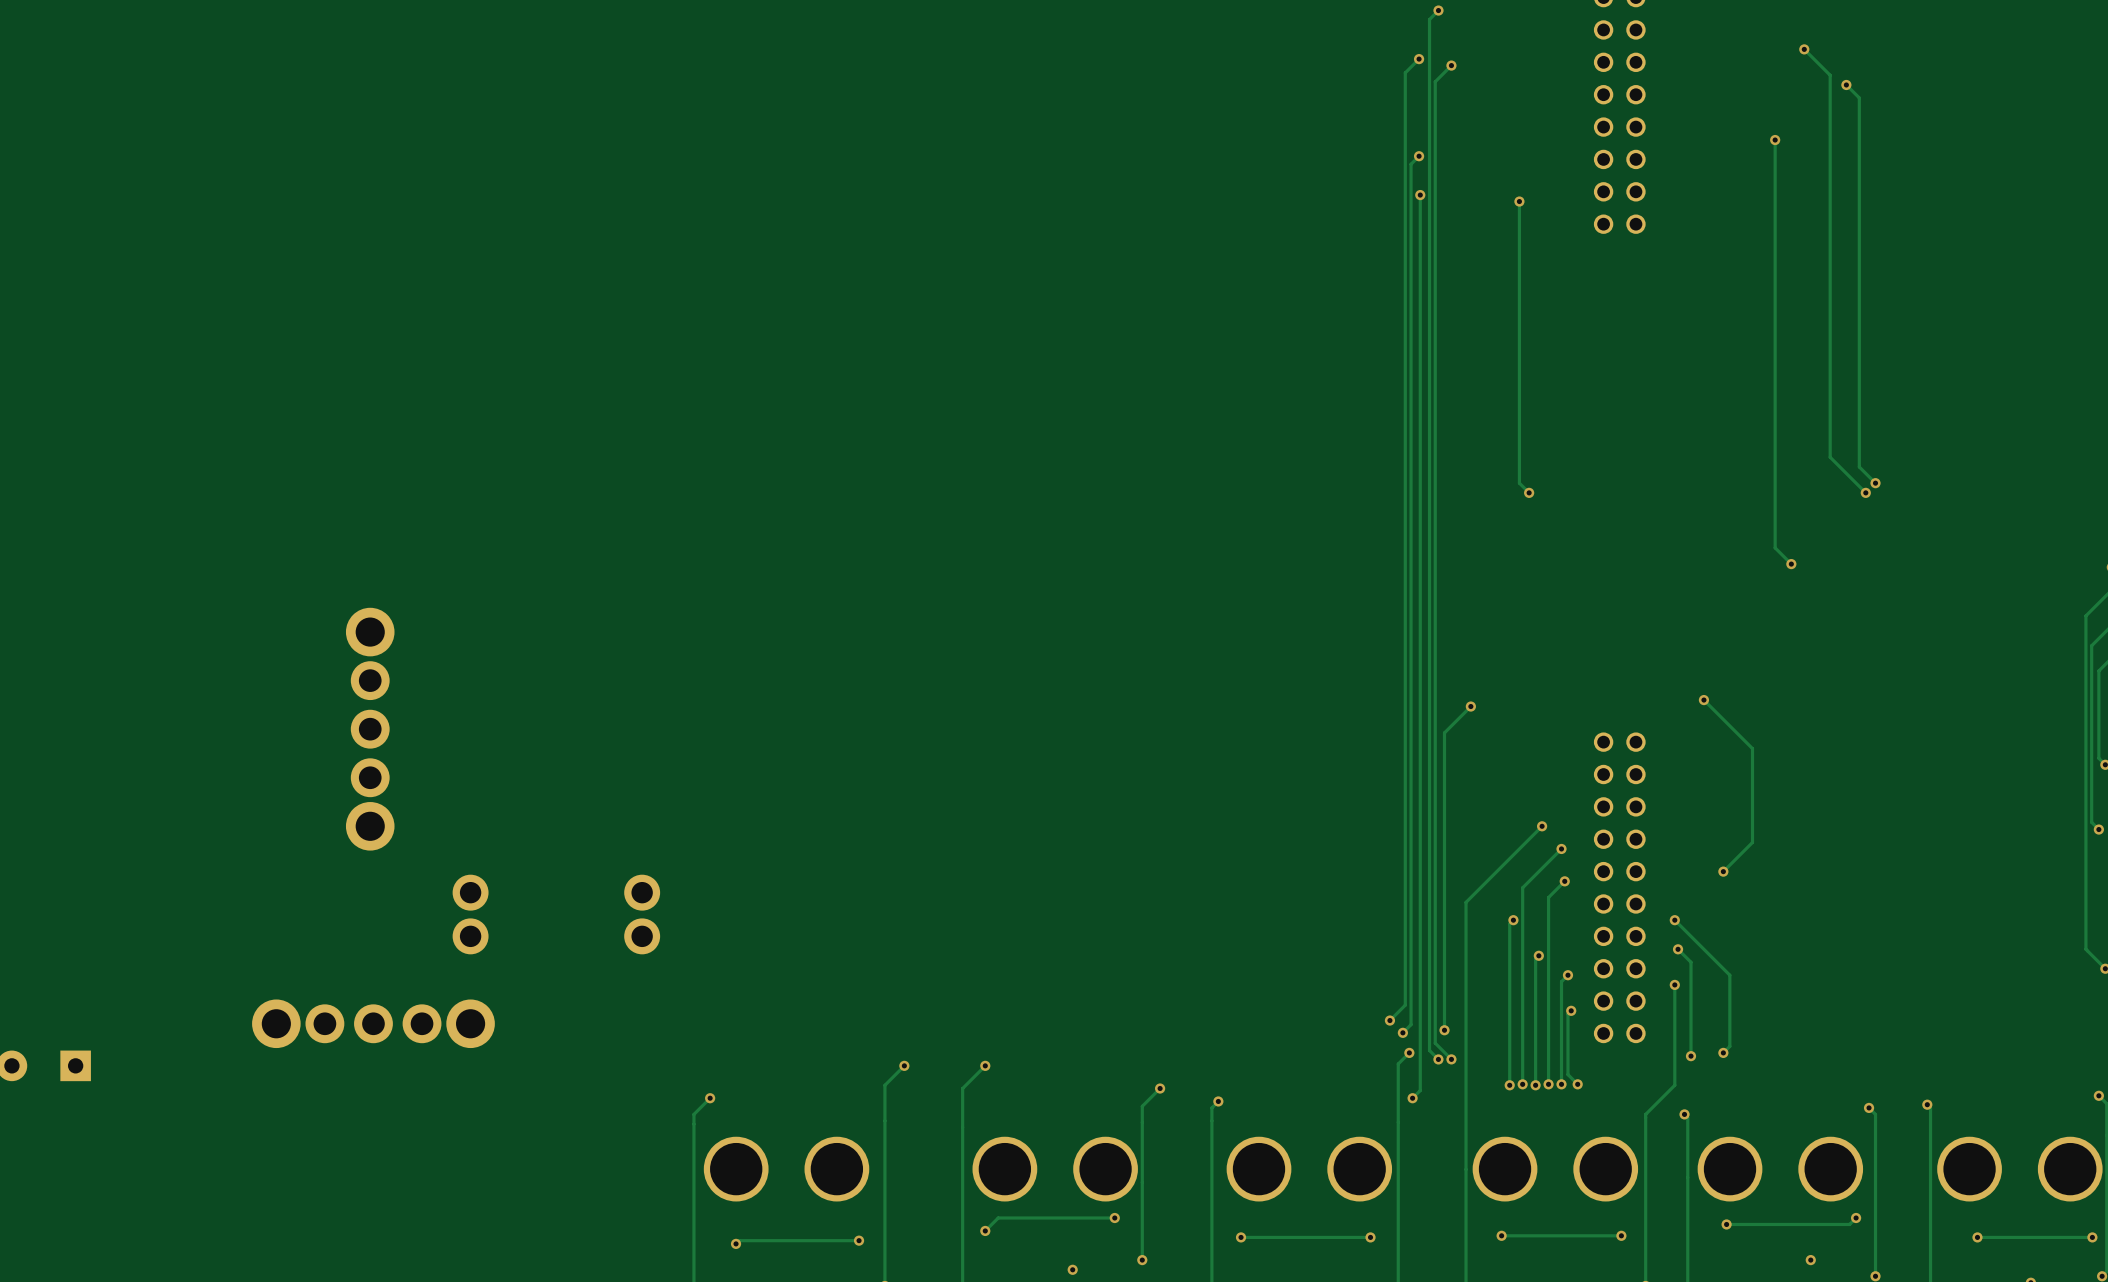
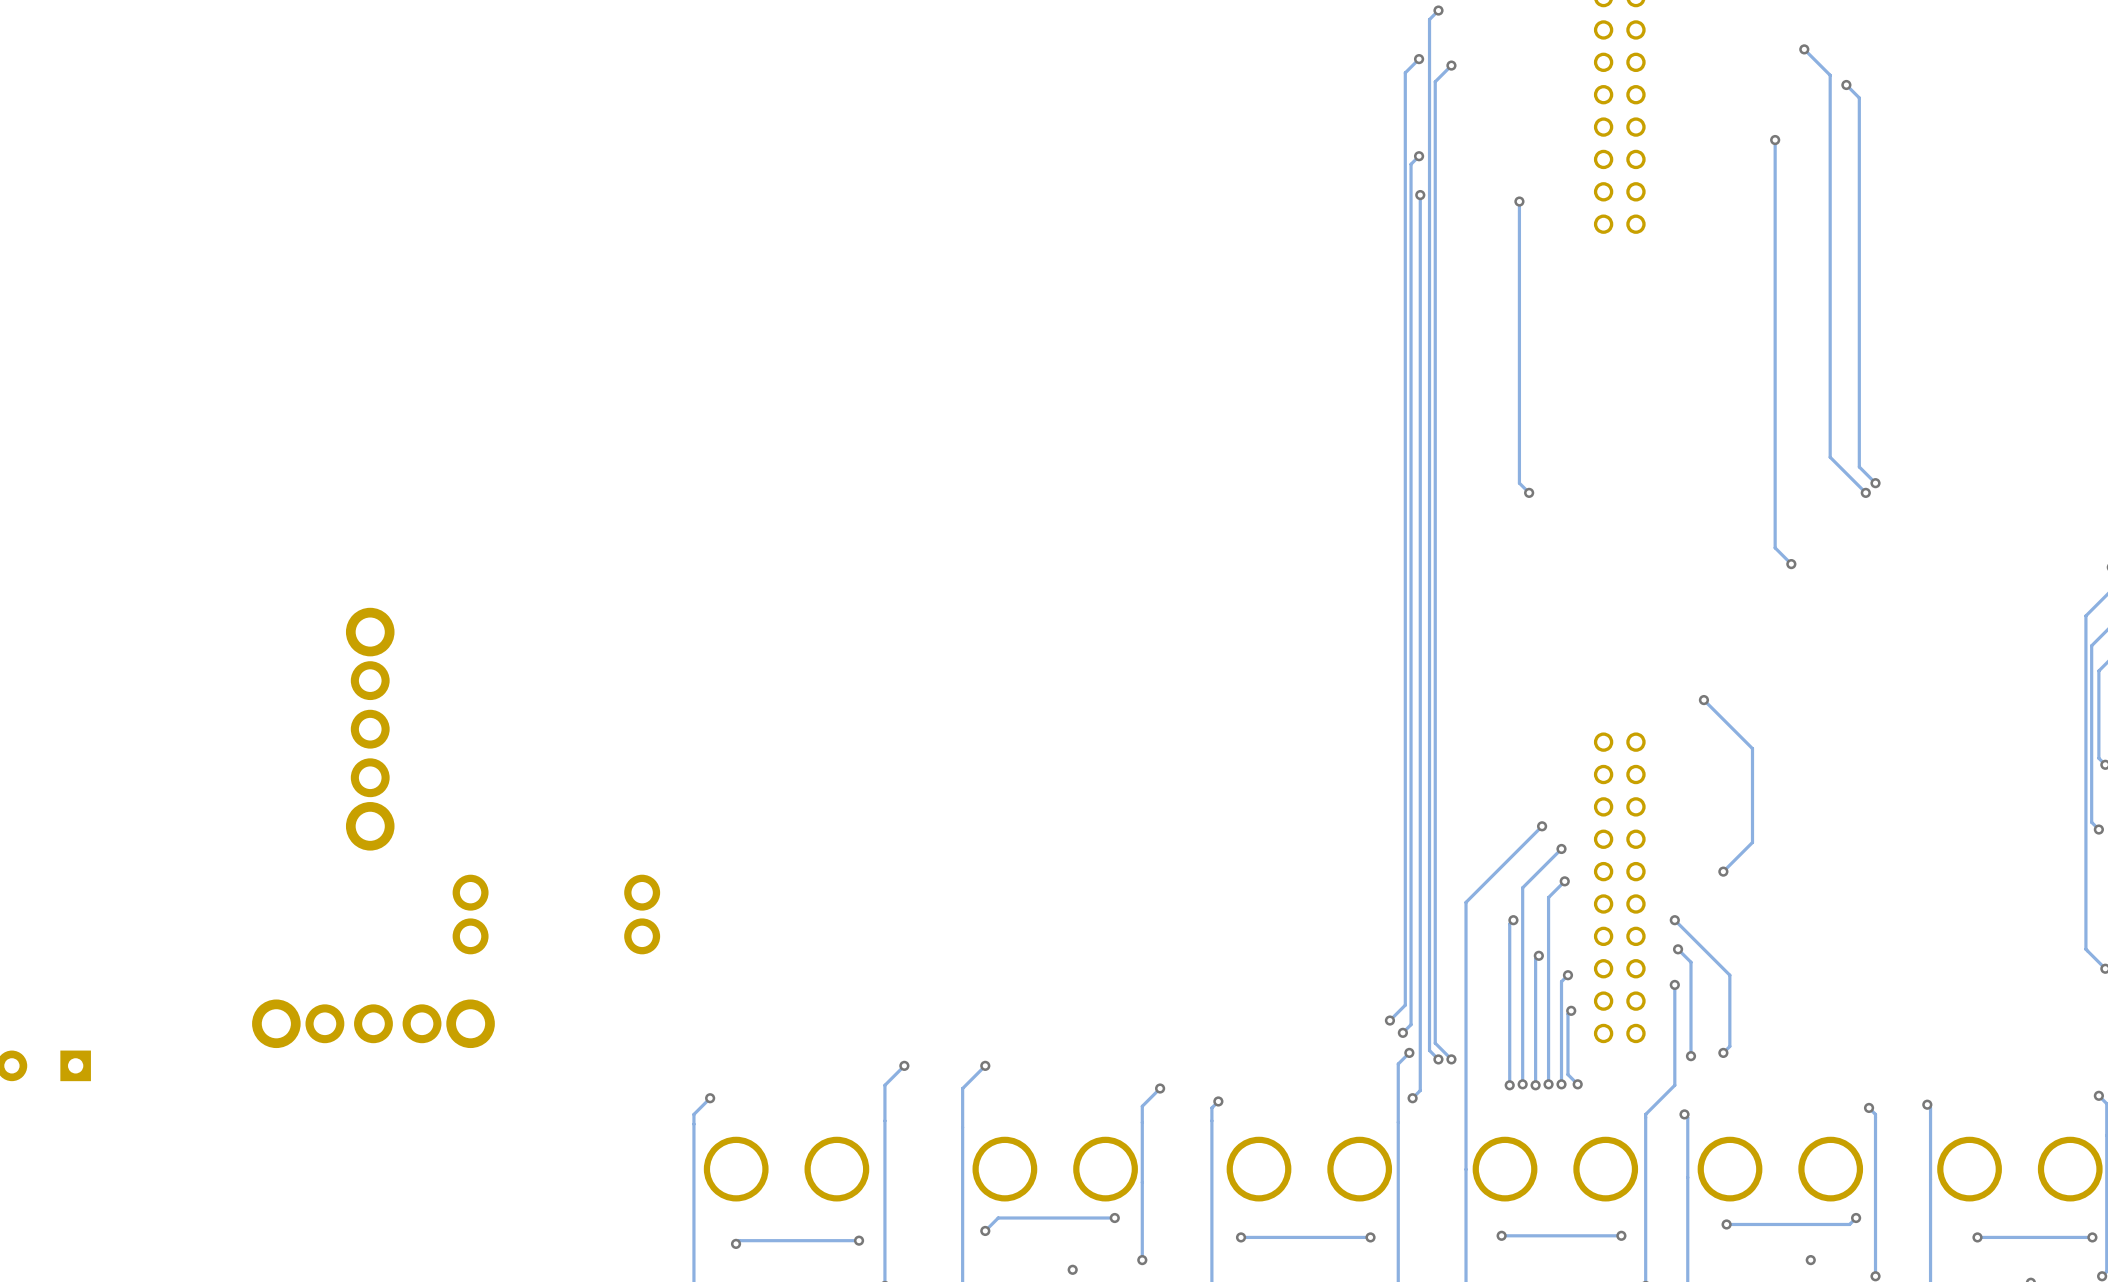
track: (1470, 706) (1444, 732) (1444, 1030) -> none
via: (1470, 706) -> none
via: (1444, 1030) -> none

